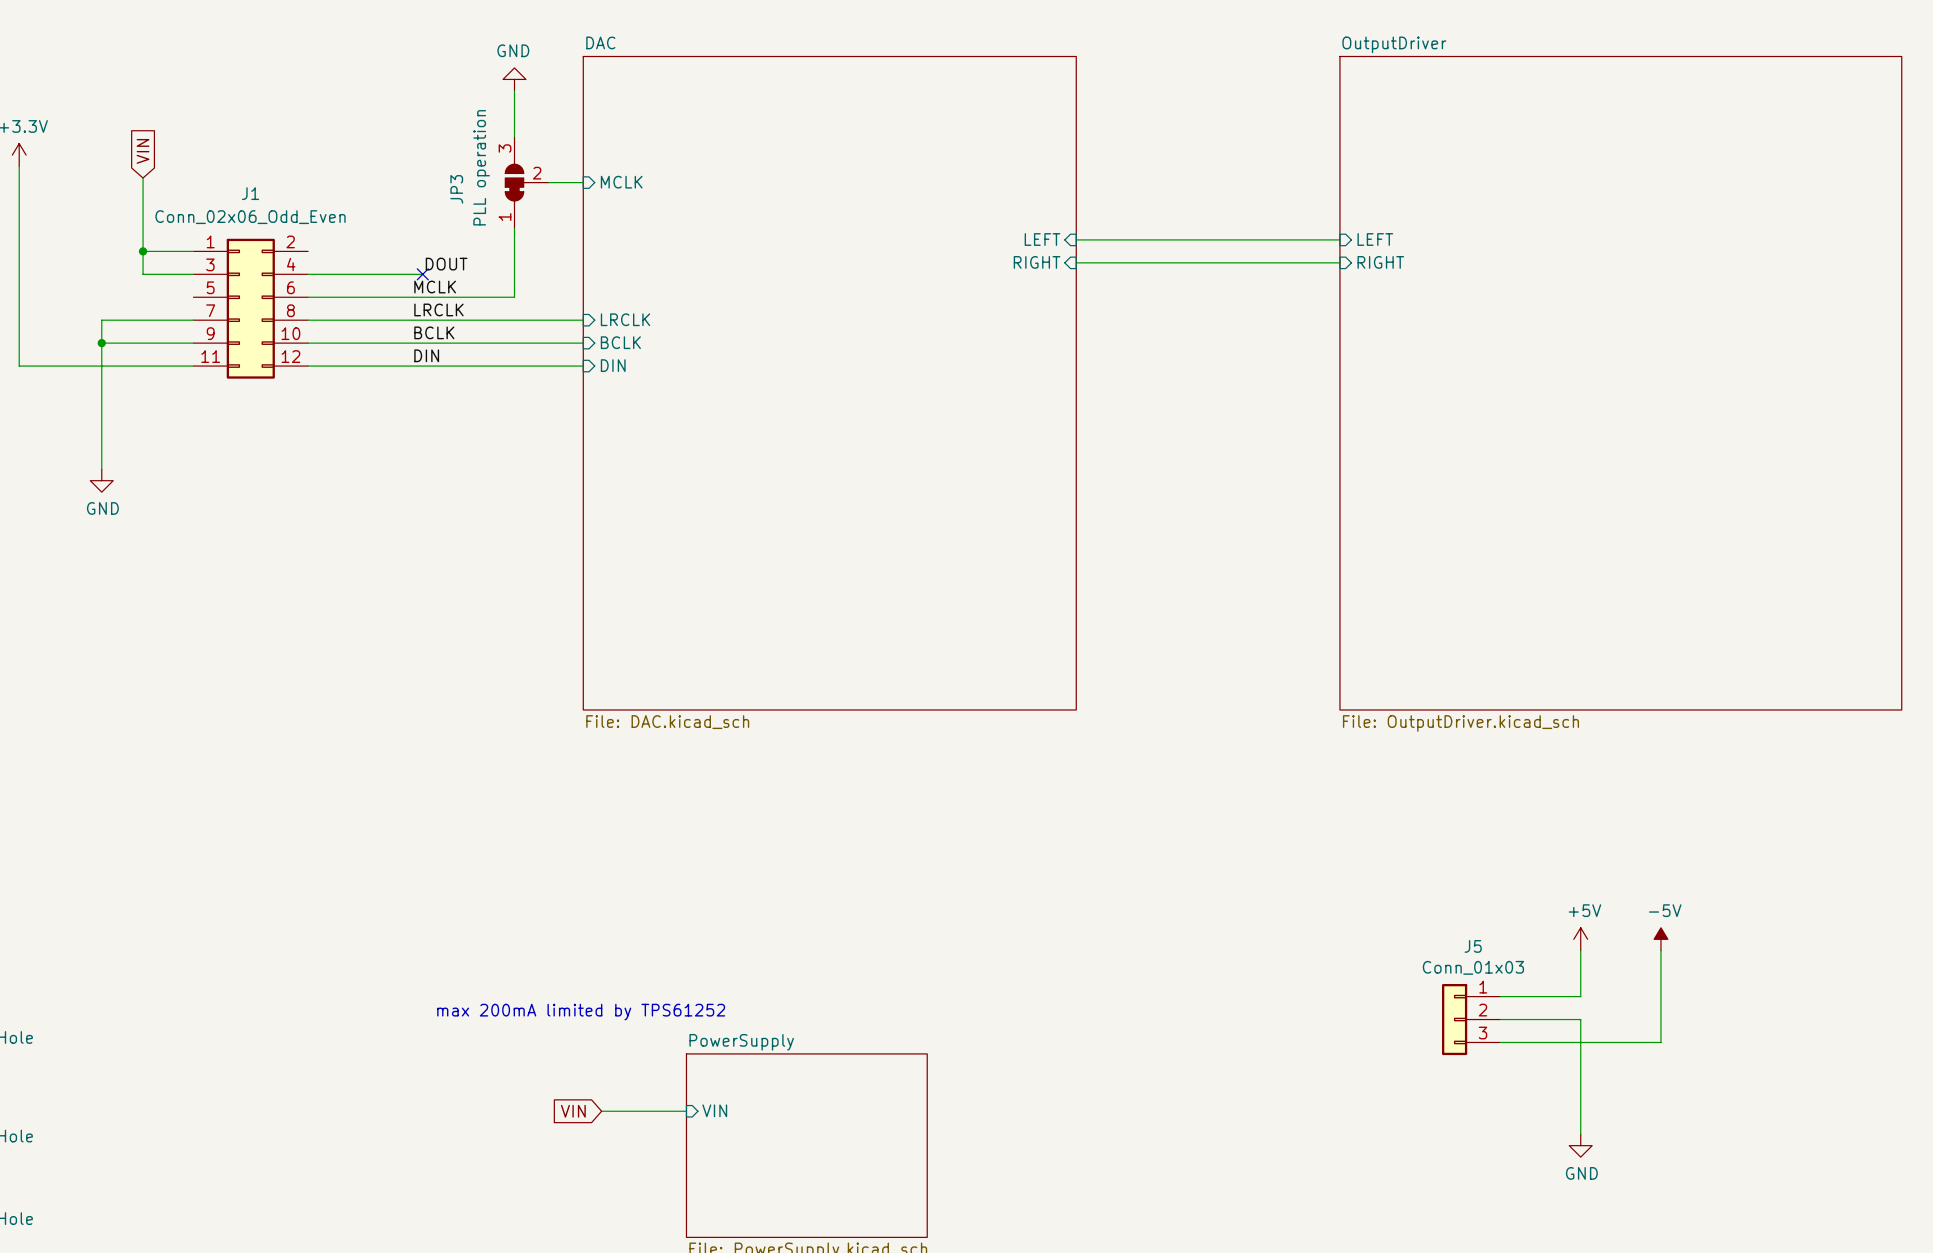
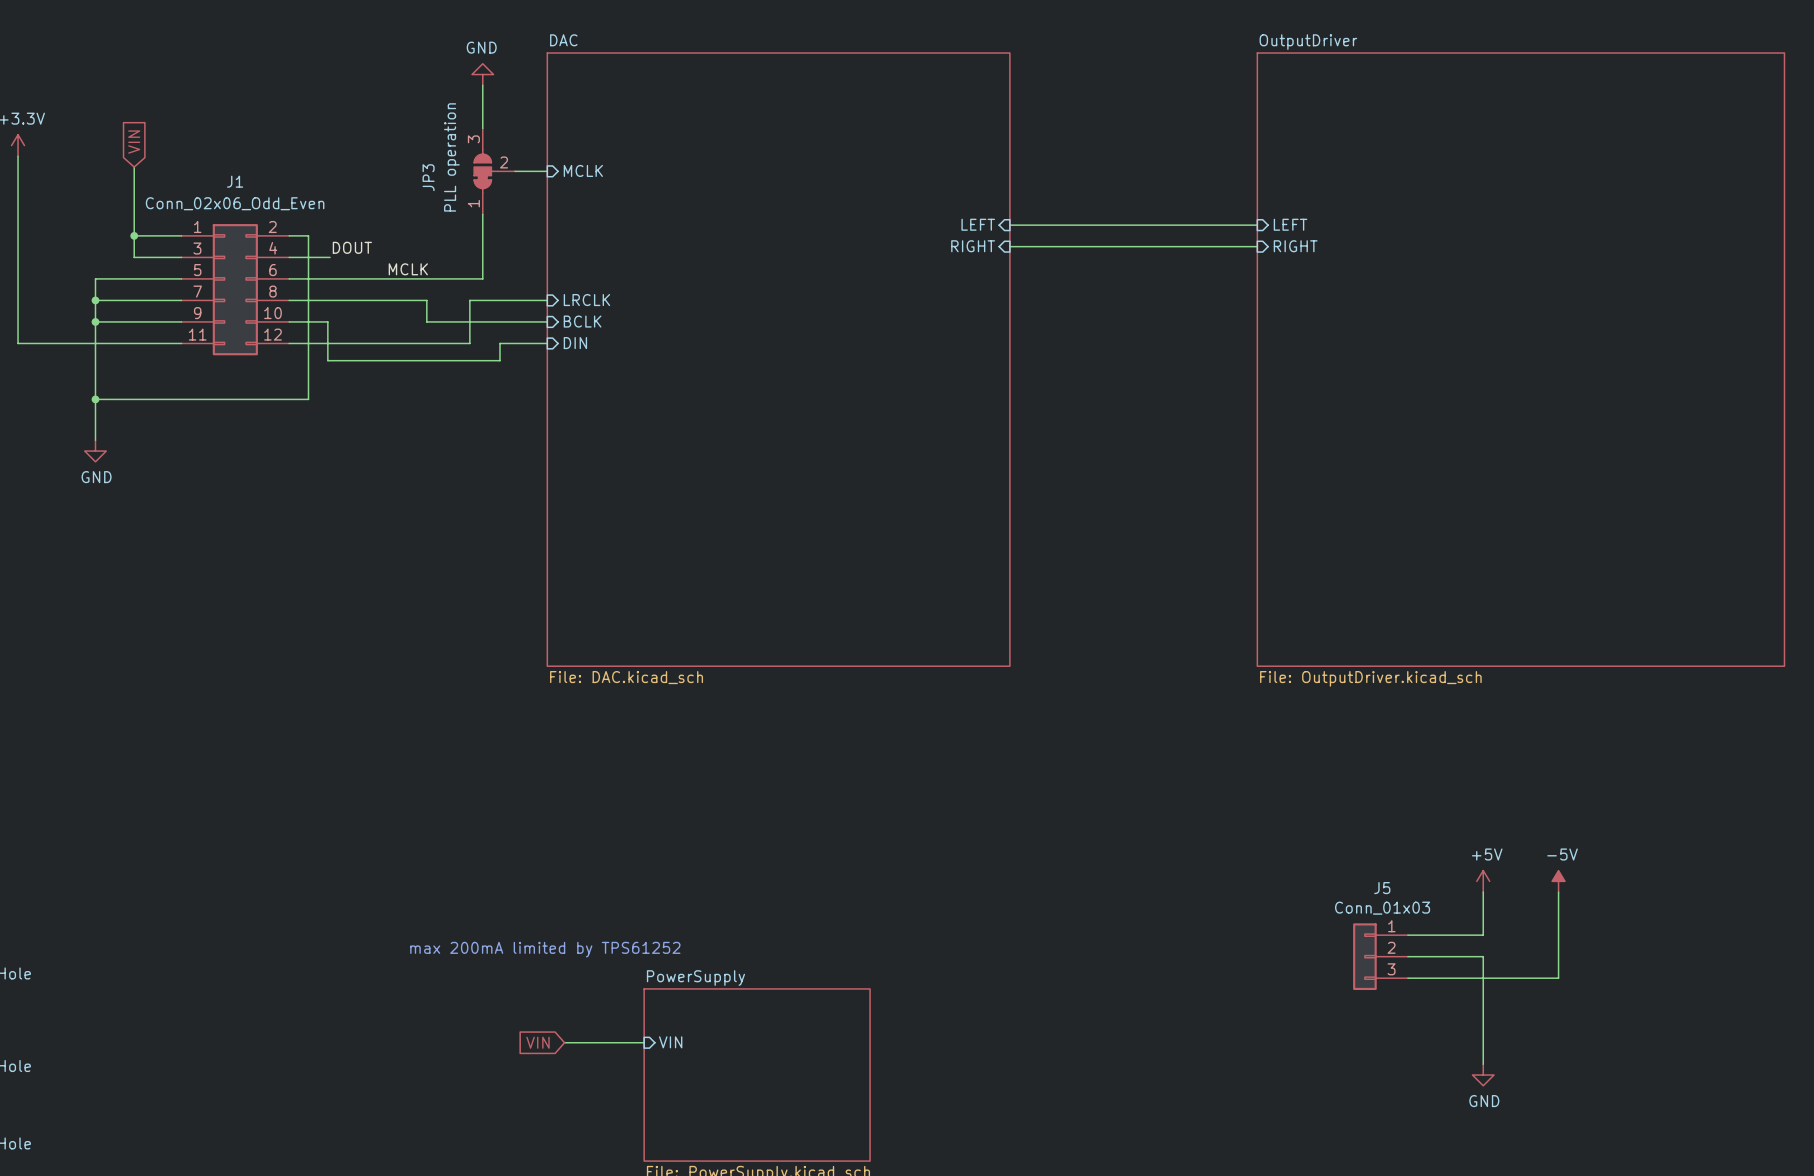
wire: none -> (289, 235) (308, 235) (308, 399) (95, 399)
label position: DOUT (446, 264) -> DOUT (352, 247)
wire: (351, 274) (422, 274) -> none
no-connect mark: (422, 274) -> none
wire: none -> (181, 278) (95, 278) (95, 300)
label: LRCLK (438, 309) -> none
junction: none -> (95, 300)
wire: (454, 320) (500, 320) -> (426, 300) (426, 321)
label: BCLK (434, 332) -> none
wire: (349, 343) (454, 343) -> (327, 321) (327, 360) (499, 360) (499, 343)
label: DIN (426, 355) -> none
wire: (500, 366) (532, 366) -> (469, 343) (469, 300)
junction: none -> (95, 399)

